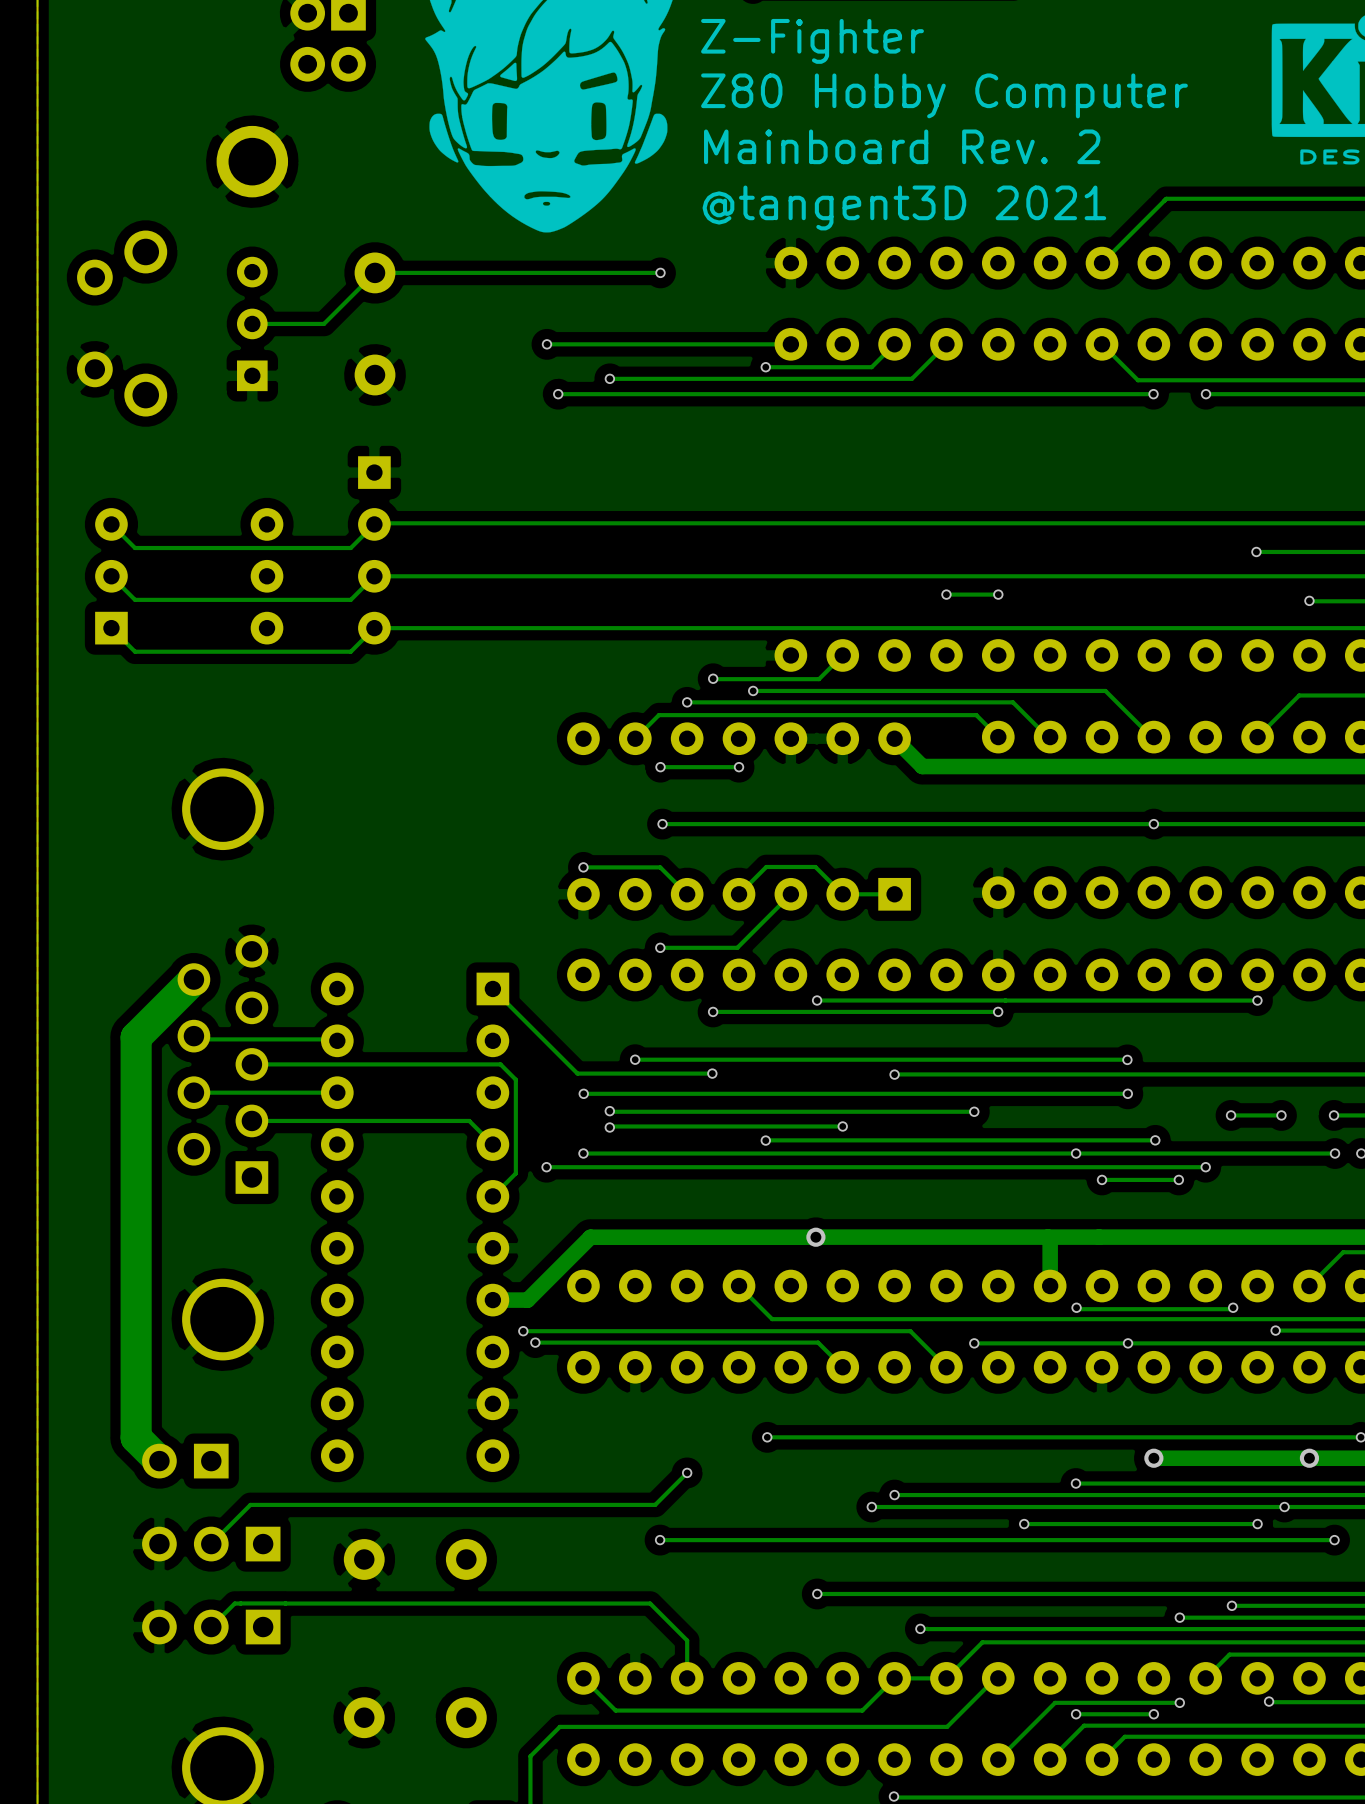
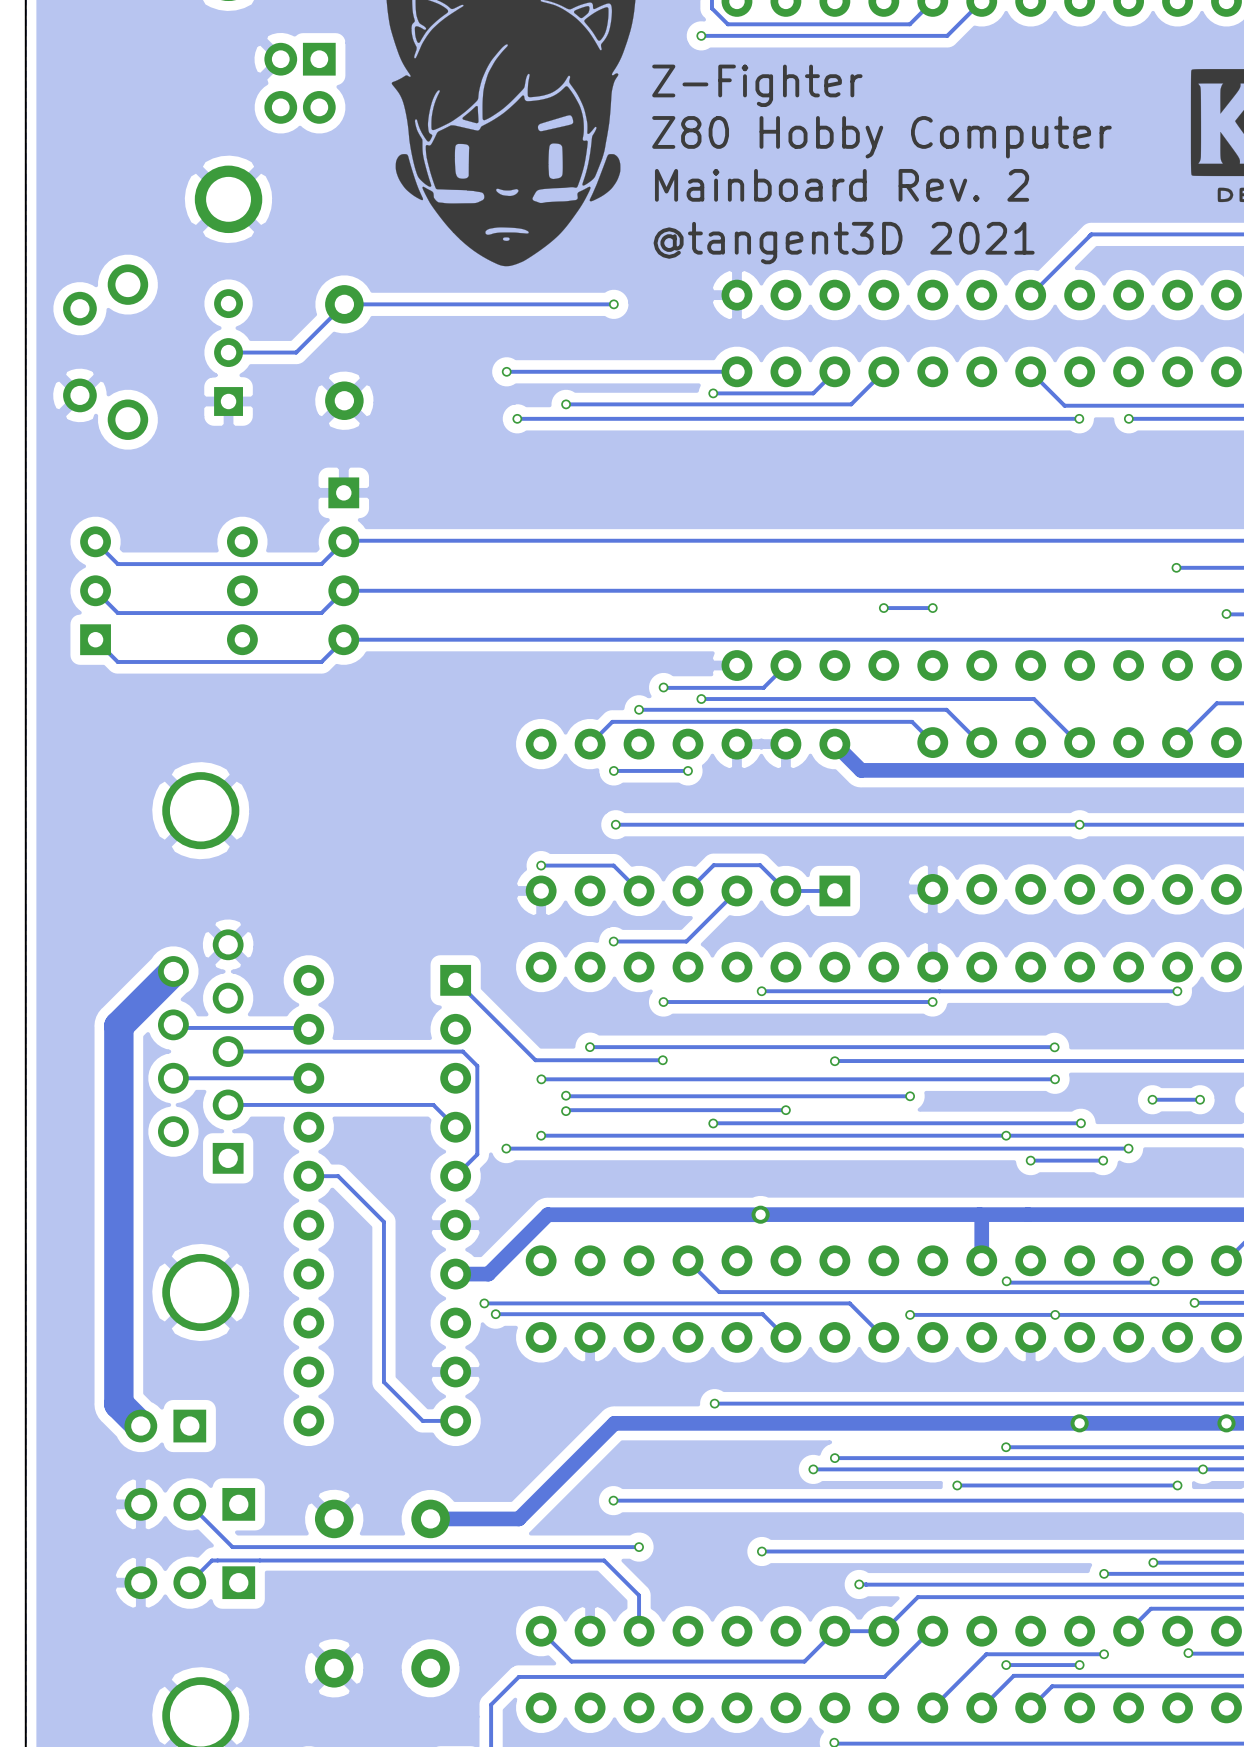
track: none -> (308, 1176) (338, 1176) (383, 1221) (383, 1382) (422, 1420) (455, 1420)
track: none -> (1079, 1423) (614, 1423) (518, 1518) (430, 1518)
track: (687, 1472) (655, 1504) (250, 1504) (211, 1544) -> (639, 1547) (232, 1547) (189, 1504)
via position: (687, 1472) -> (639, 1547)

